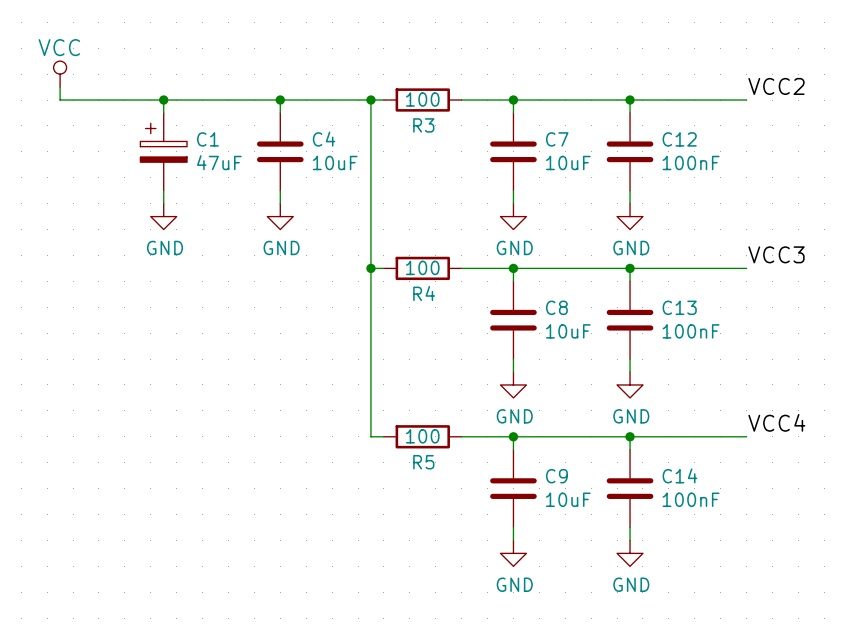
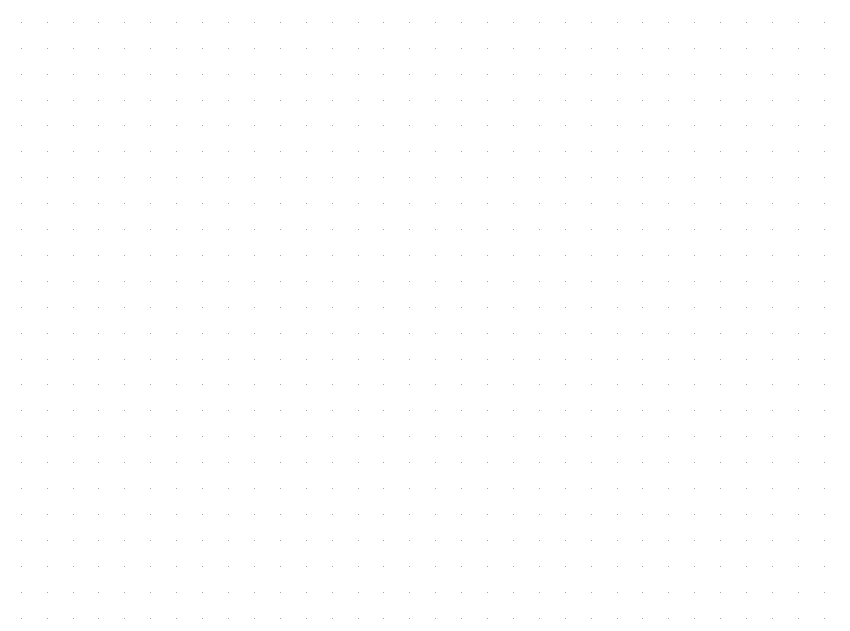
power symbol: VCC (60, 74) -> none
label: VCC2 (776, 86) -> none
wire: (60, 87) (60, 100) (383, 100) -> none
wire: (163, 100) (163, 112) -> none
junction: (163, 100) -> none
wire: (280, 100) (280, 112) -> none
junction: (280, 100) -> none
wire: (370, 100) (370, 436) (383, 436) -> none
junction: (370, 100) -> none
R3: 100 (422, 100) -> none
wire: (461, 100) (746, 100) -> none
wire: (513, 100) (513, 112) -> none
junction: (513, 100) -> none
wire: (630, 100) (630, 112) -> none
junction: (630, 100) -> none
C1: 47uF (163, 151) -> none
C4: 10uF (280, 151) -> none
C7: 10uF (513, 151) -> none
C12: 100nF (630, 151) -> none
wire: (163, 190) (163, 203) -> none
wire: (280, 190) (280, 203) -> none
wire: (513, 190) (513, 203) -> none
wire: (630, 190) (630, 203) -> none
power symbol: GND (163, 216) -> none
power symbol: GND (280, 216) -> none
power symbol: GND (513, 216) -> none
power symbol: GND (630, 216) -> none
label: VCC3 (776, 254) -> none
wire: (370, 268) (383, 268) -> none
junction: (370, 268) -> none
R4: 100 (422, 268) -> none
wire: (461, 268) (746, 268) -> none
wire: (513, 268) (513, 281) -> none
junction: (513, 268) -> none
wire: (630, 268) (630, 281) -> none
junction: (630, 268) -> none
C8: 10uF (513, 320) -> none
C13: 100nF (630, 320) -> none
wire: (513, 359) (513, 372) -> none
wire: (630, 359) (630, 372) -> none
power symbol: GND (513, 384) -> none
power symbol: GND (630, 384) -> none
label: VCC4 (776, 422) -> none
R5: 100 (422, 436) -> none
wire: (461, 436) (746, 436) -> none
wire: (513, 436) (513, 449) -> none
junction: (513, 436) -> none
wire: (630, 436) (630, 449) -> none
junction: (630, 436) -> none
C9: 10uF (513, 488) -> none
C14: 100nF (630, 488) -> none
wire: (513, 527) (513, 540) -> none
wire: (630, 527) (630, 540) -> none
power symbol: GND (513, 553) -> none
power symbol: GND (630, 553) -> none

